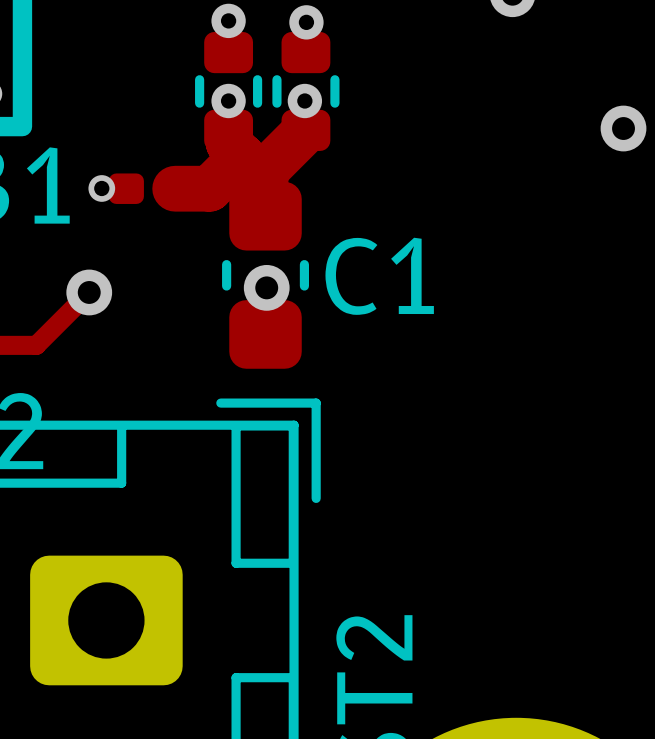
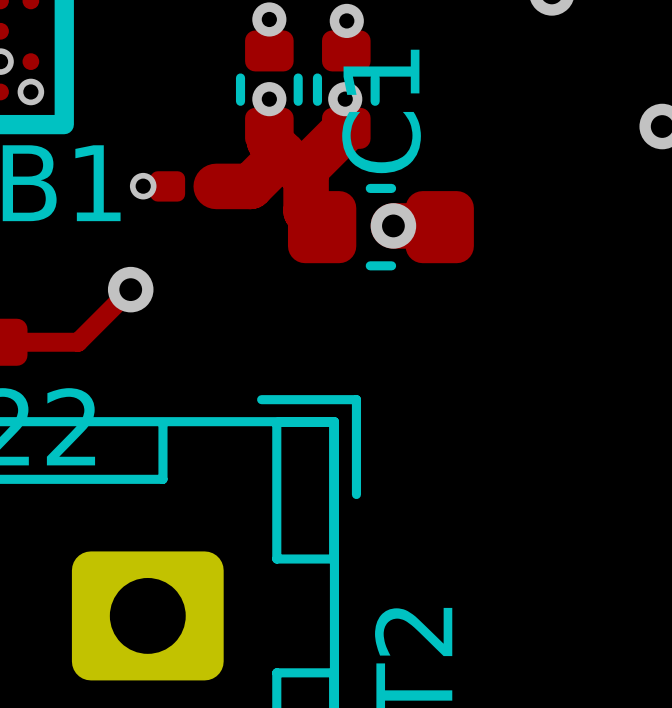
C1 rotation: 0° (265, 275) -> 90° clockwise (380, 227)
C1 name position: C1 (379, 276) -> C1 (381, 111)
via position: (266, 287) -> (393, 225)

